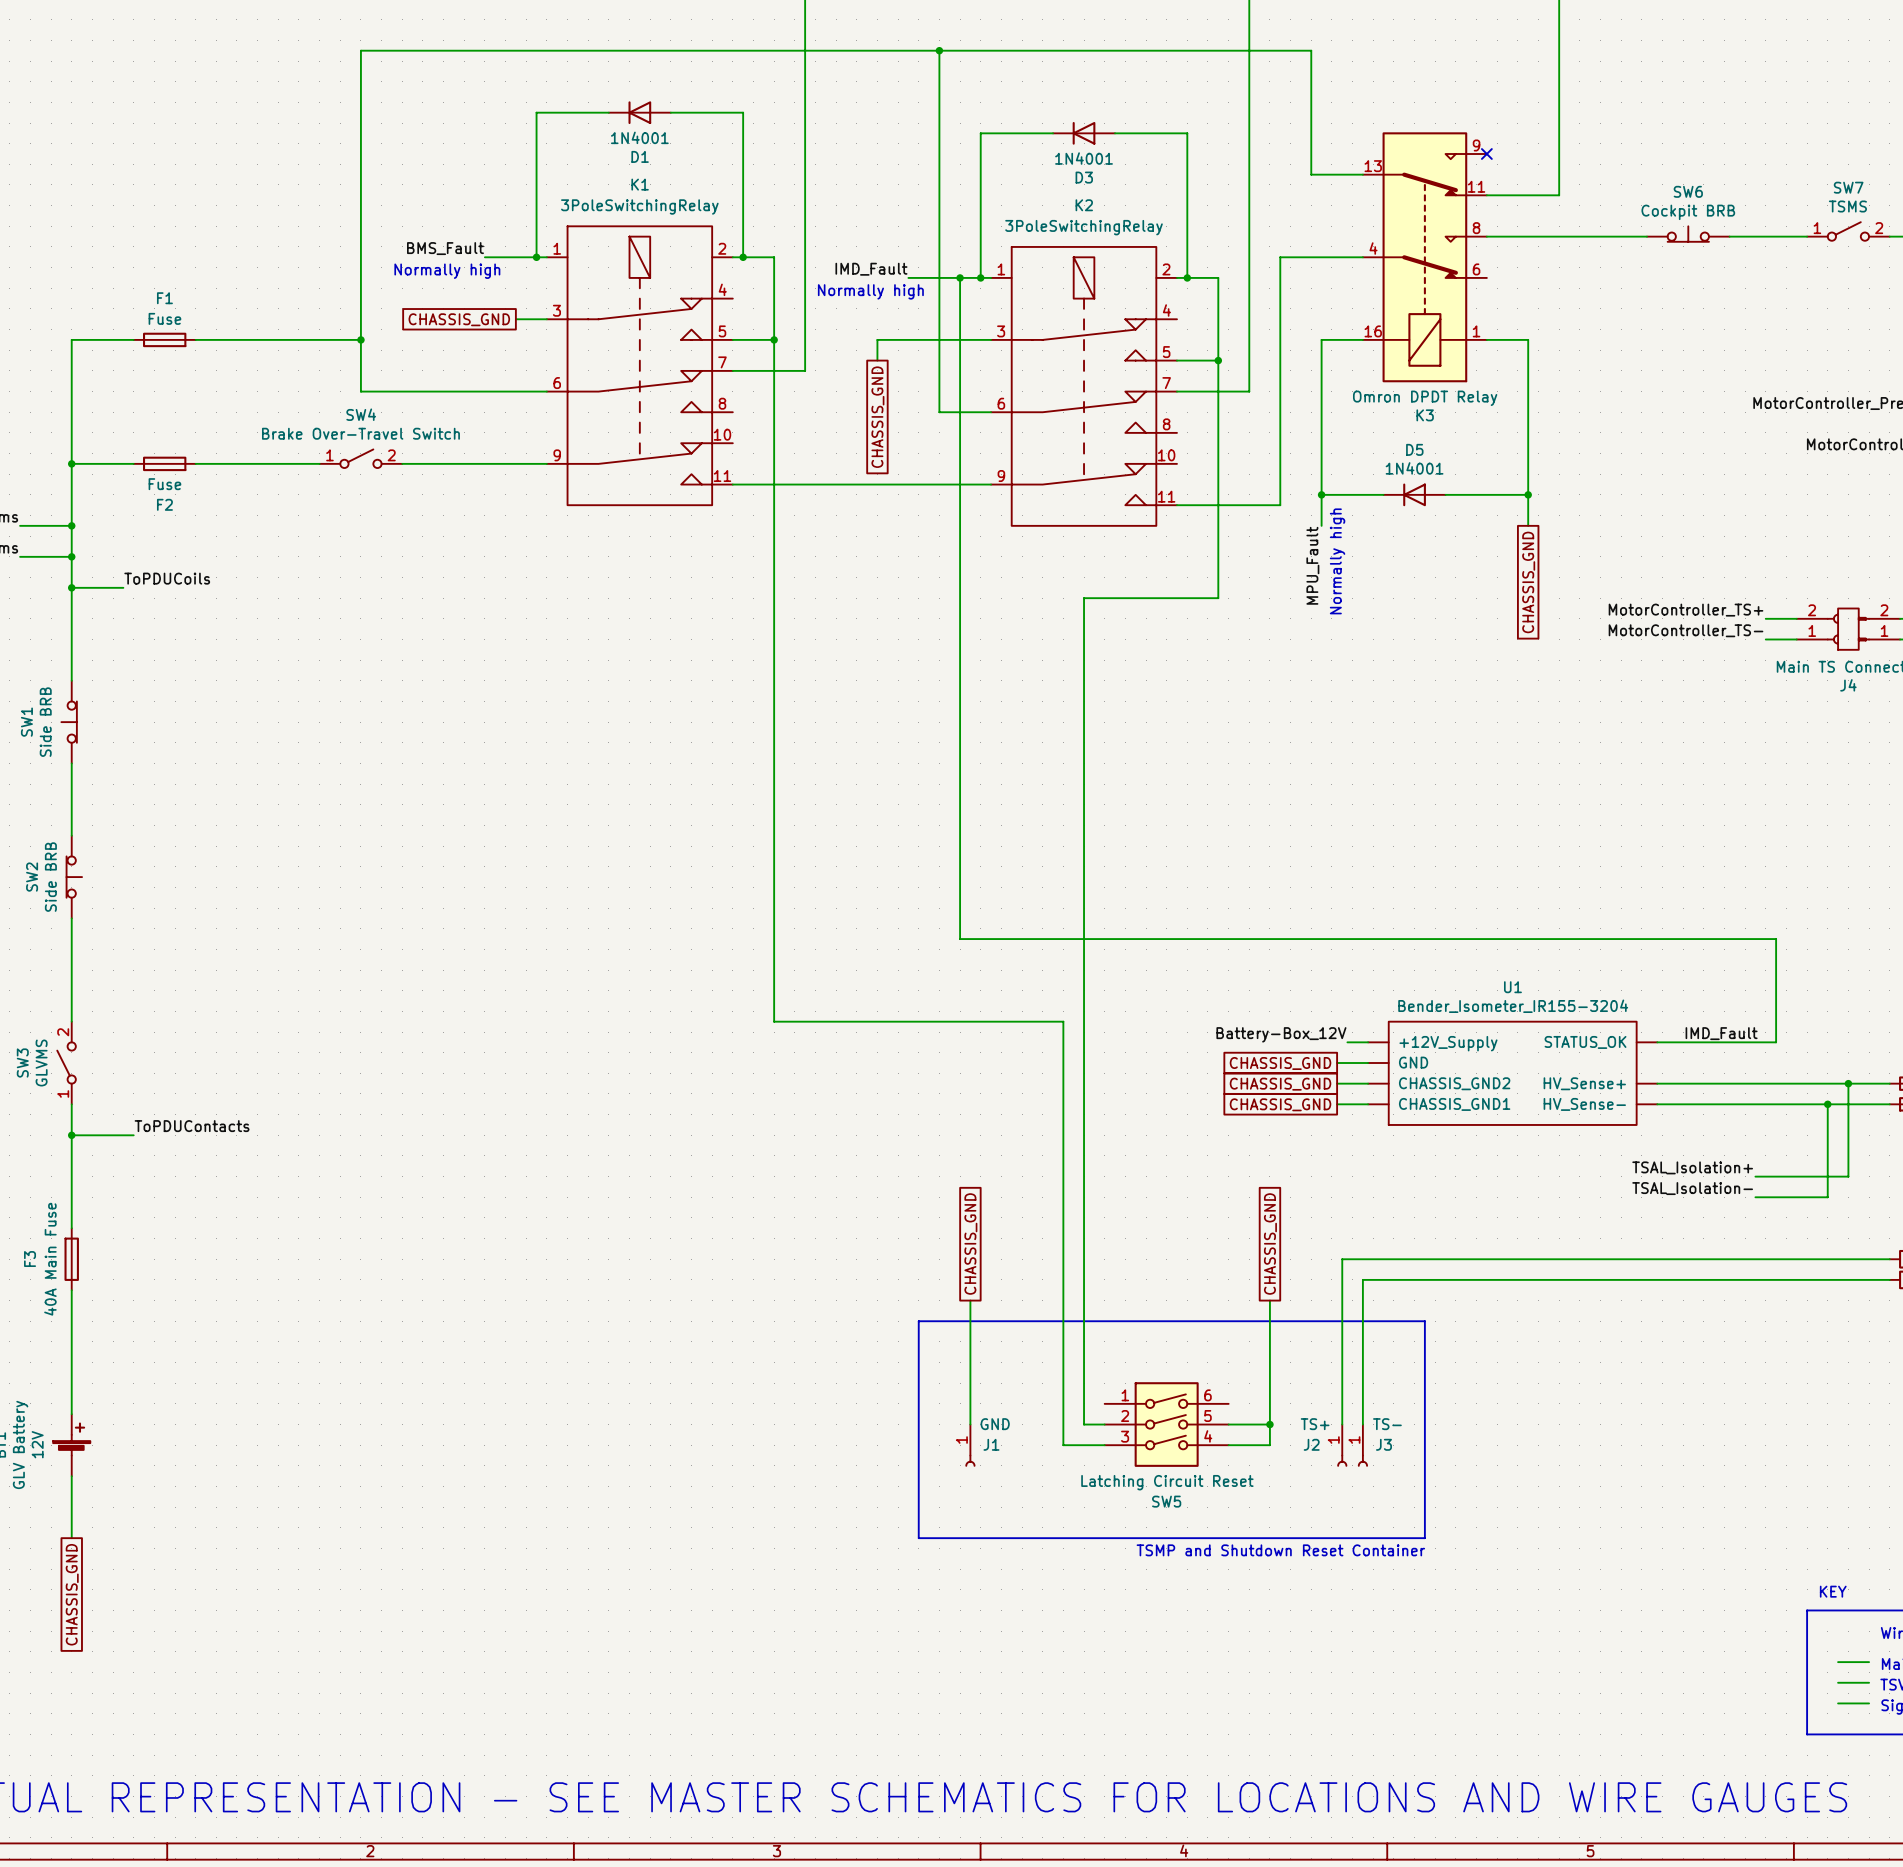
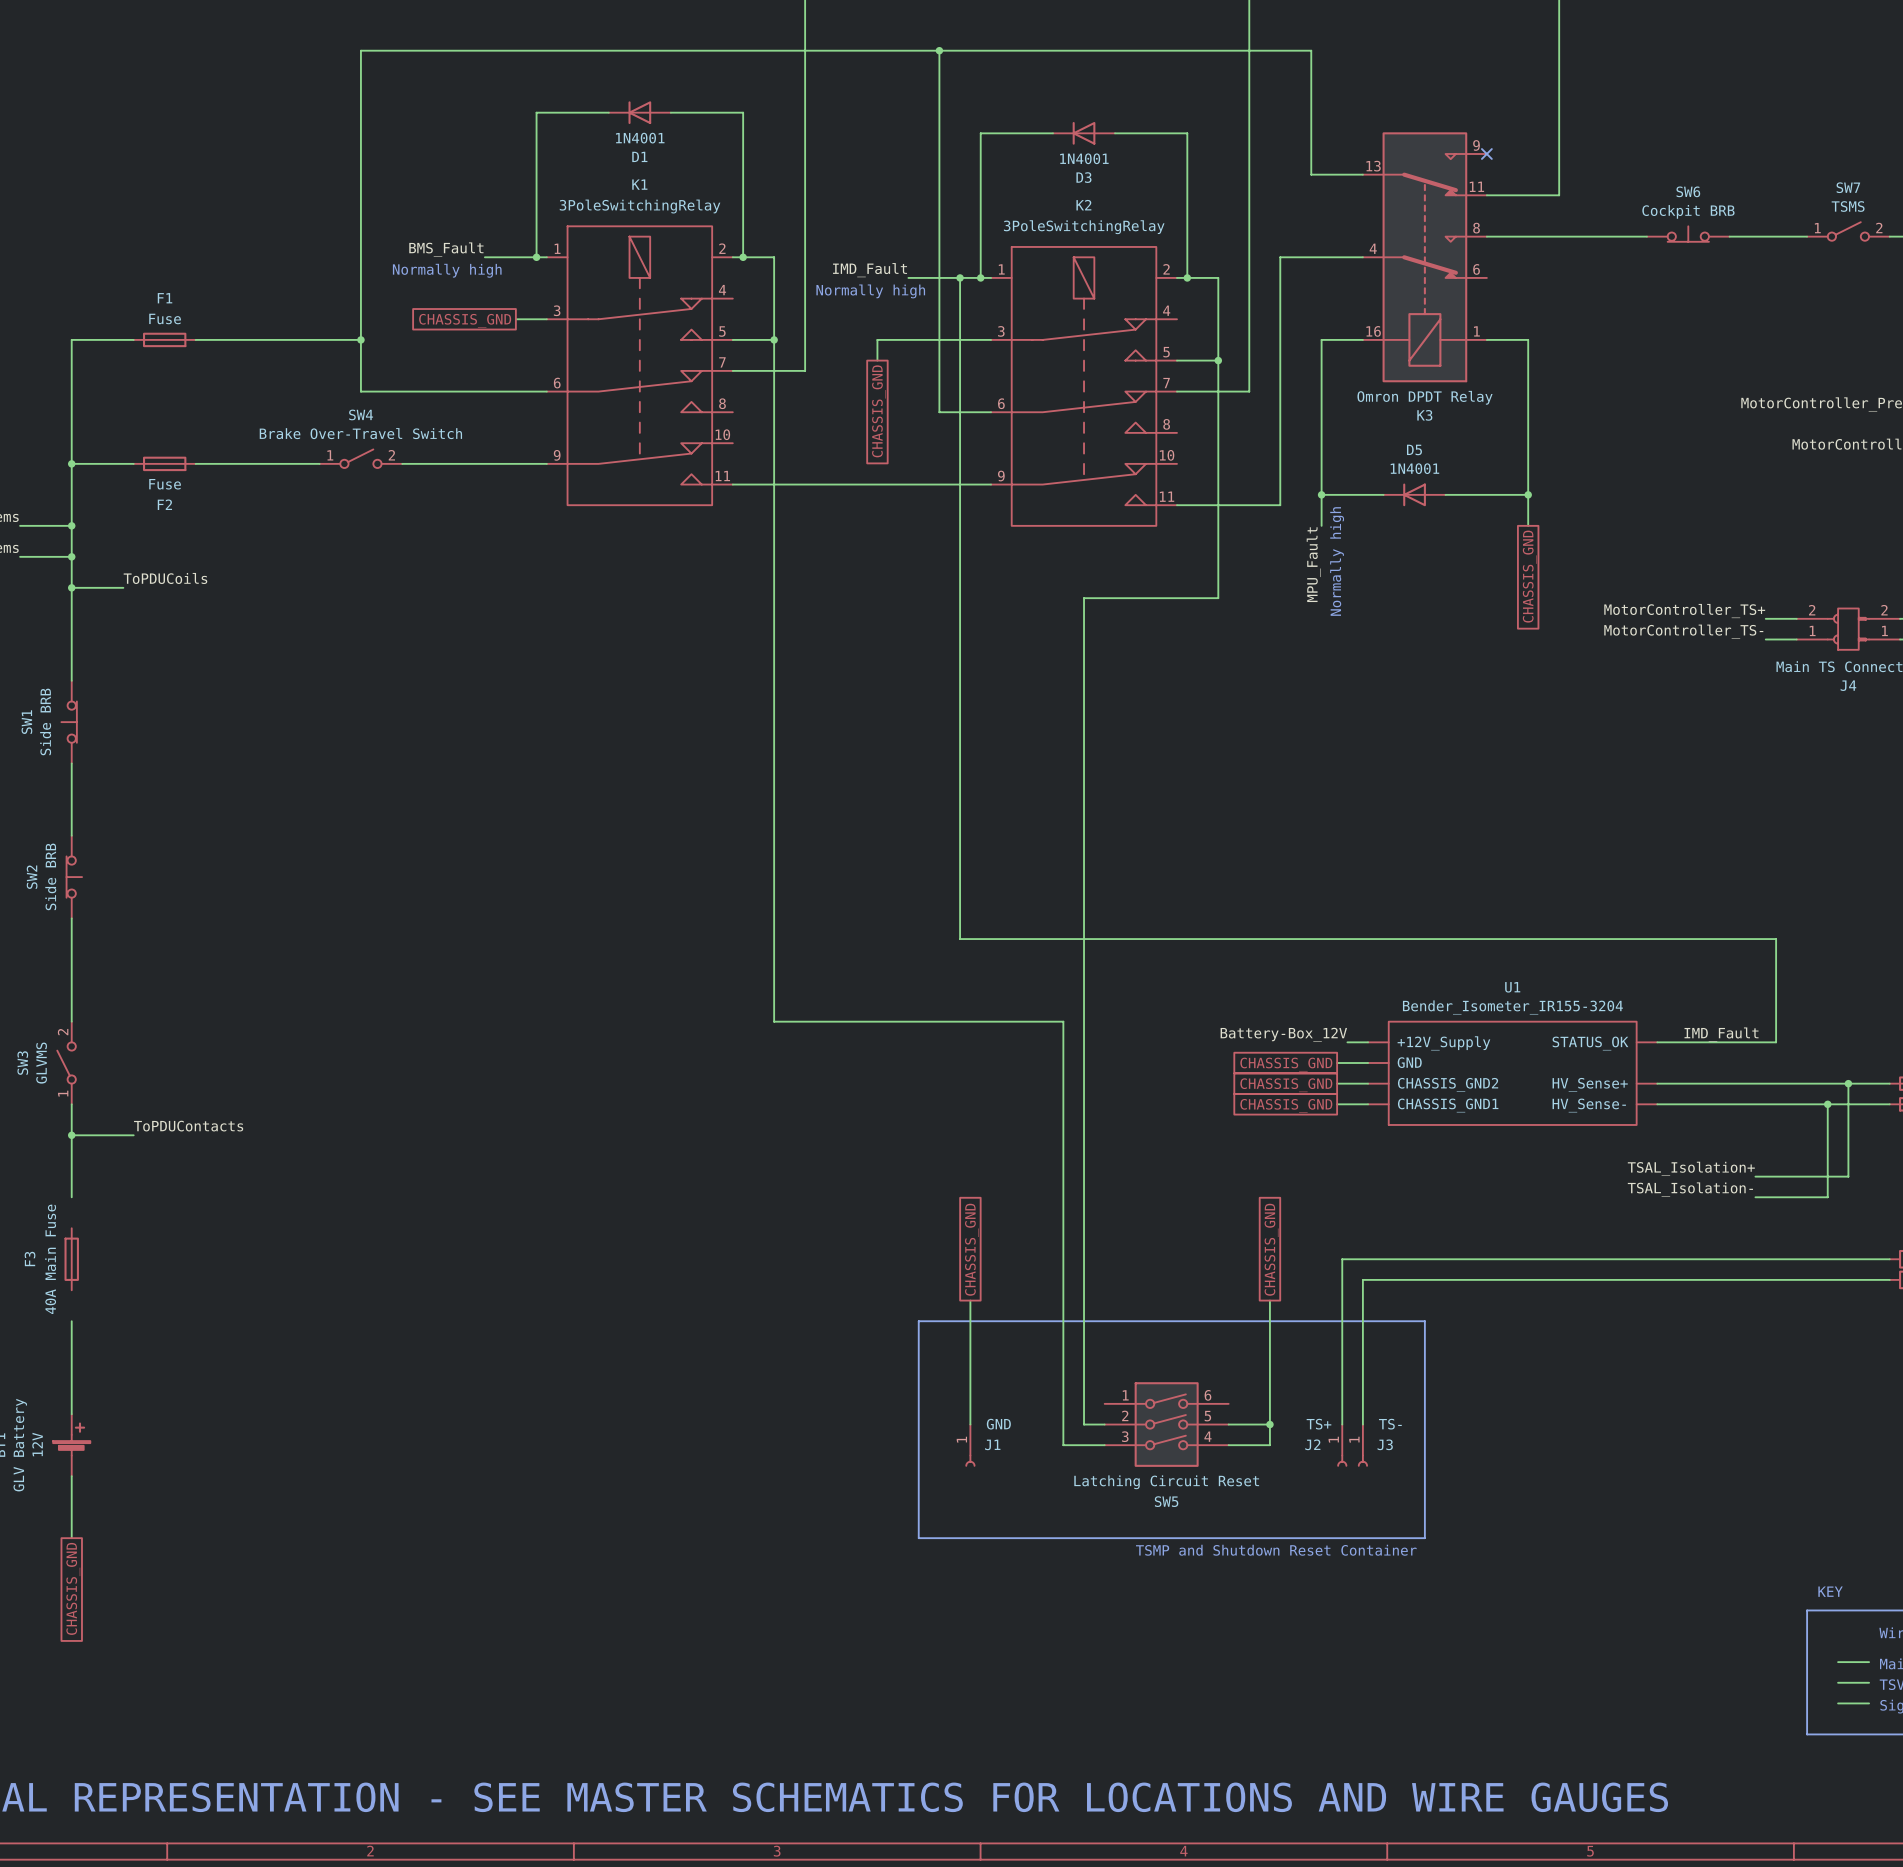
wire: (71, 1197) (71, 1228) -> none
wire: (71, 1290) (71, 1321) -> none

